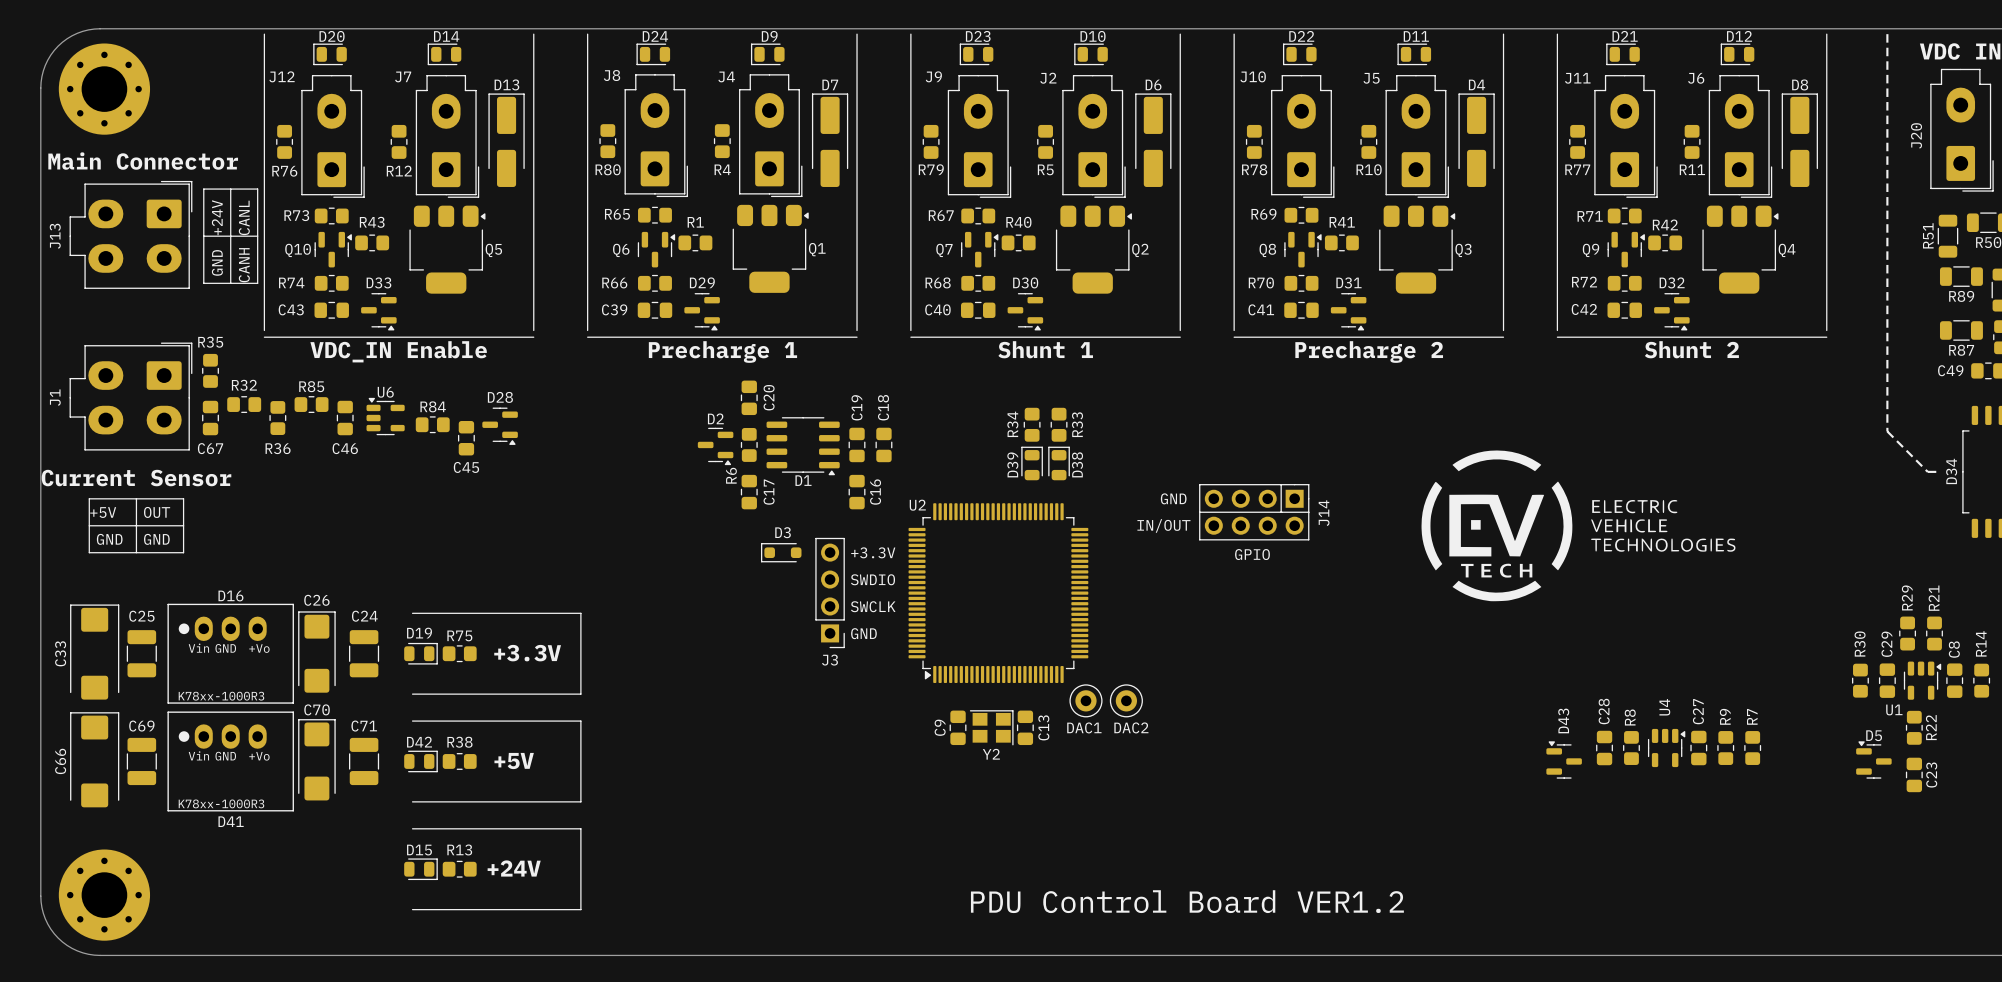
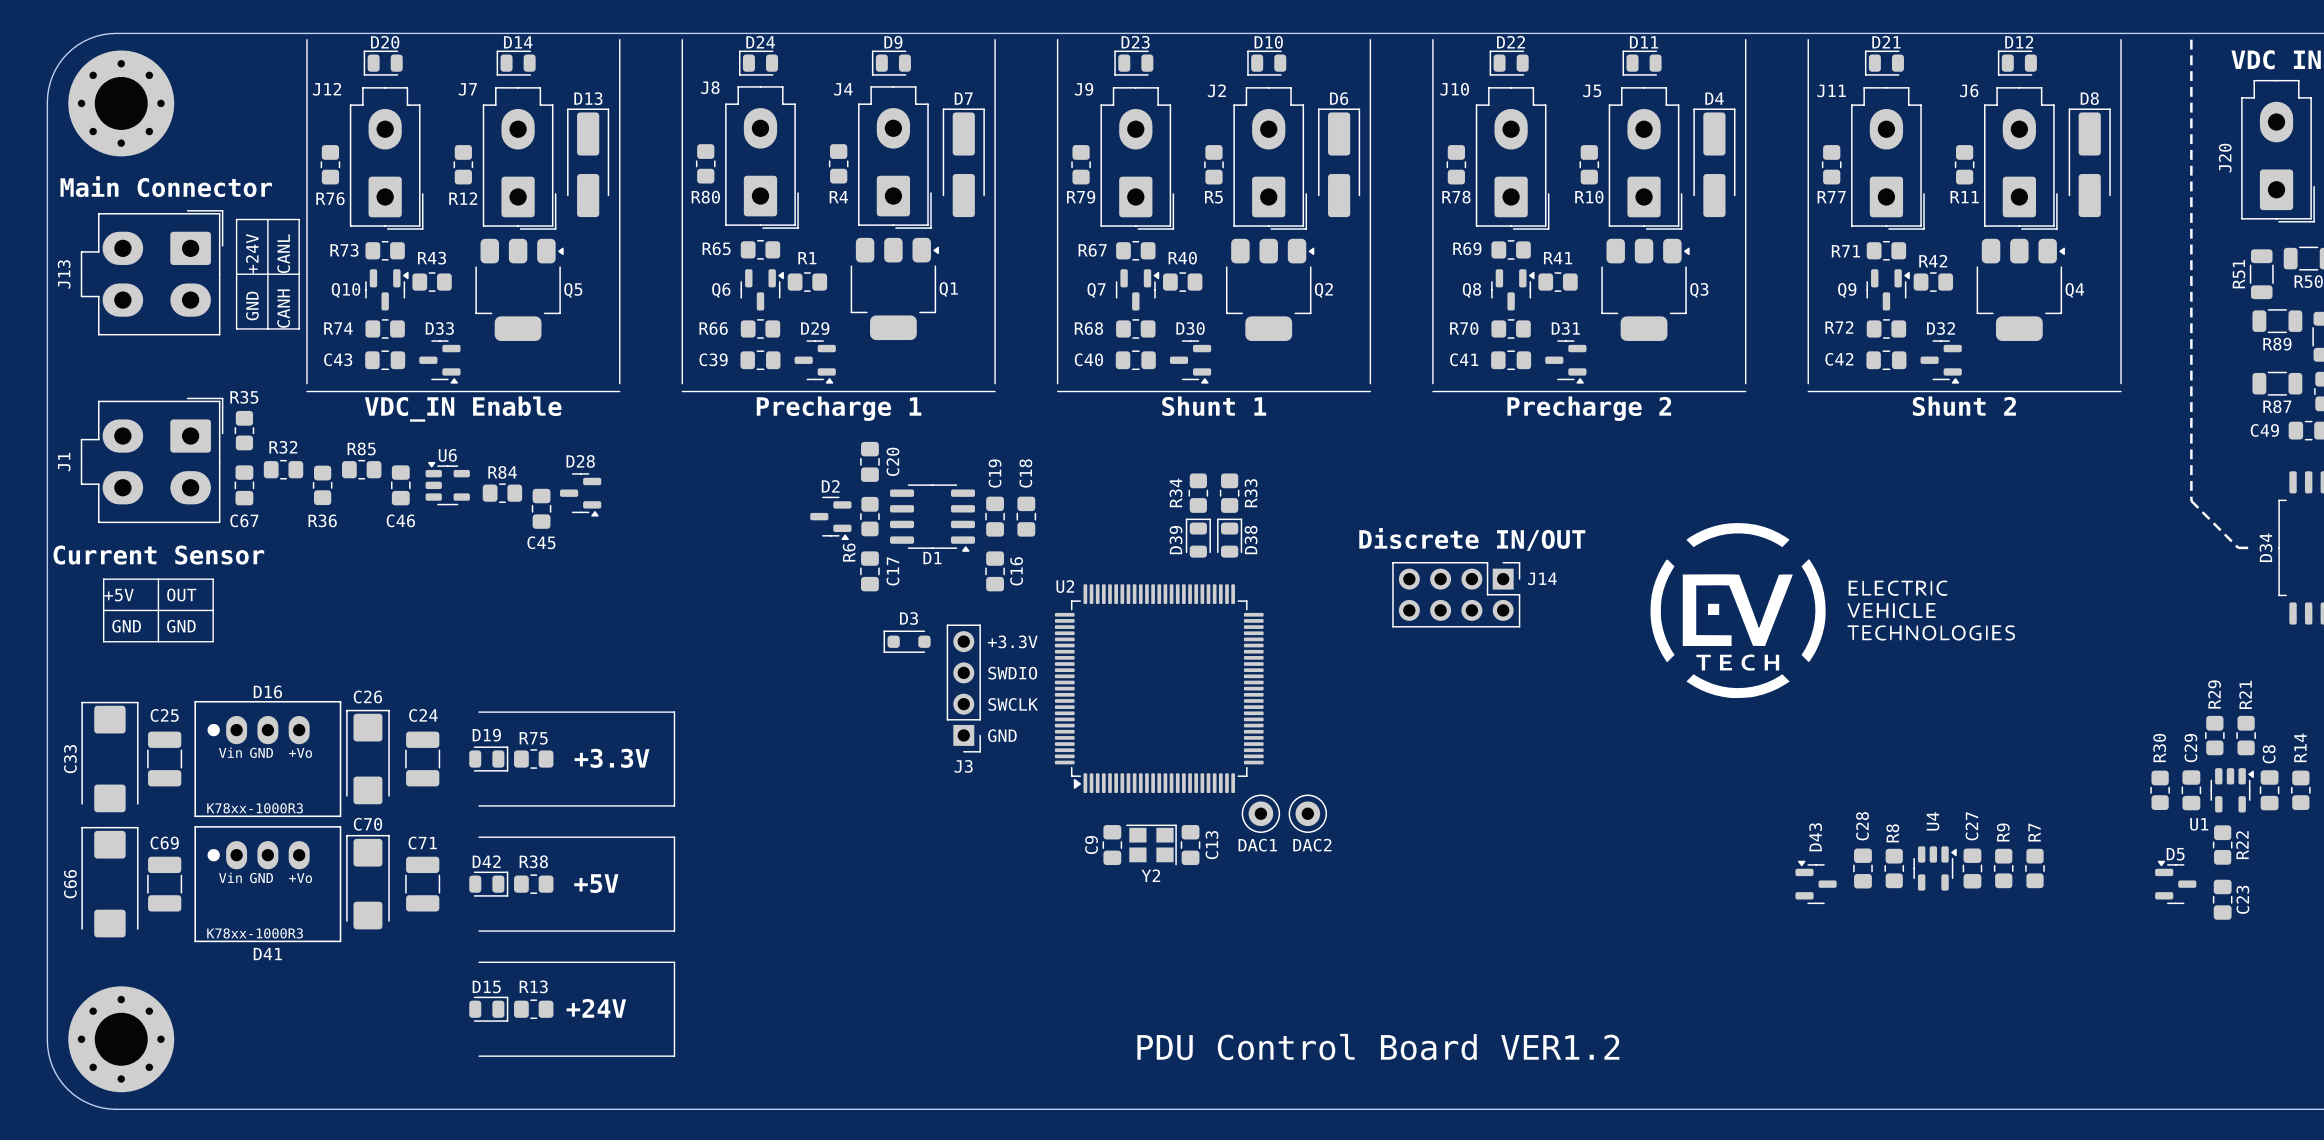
text: none -> Discrete IN/OUT (1472, 539)
line: (1281, 484) (1294, 484) -> none
text: GND (1173, 498) -> none
line: (1308, 498) (1308, 512) -> none
line: (1199, 512) (1281, 512) -> none
J14 name rotation: 0° (1324, 513) -> 90° clockwise (1542, 578)
text: IN/OUT (1163, 525) -> none
text: GPIO (1252, 554) -> none

